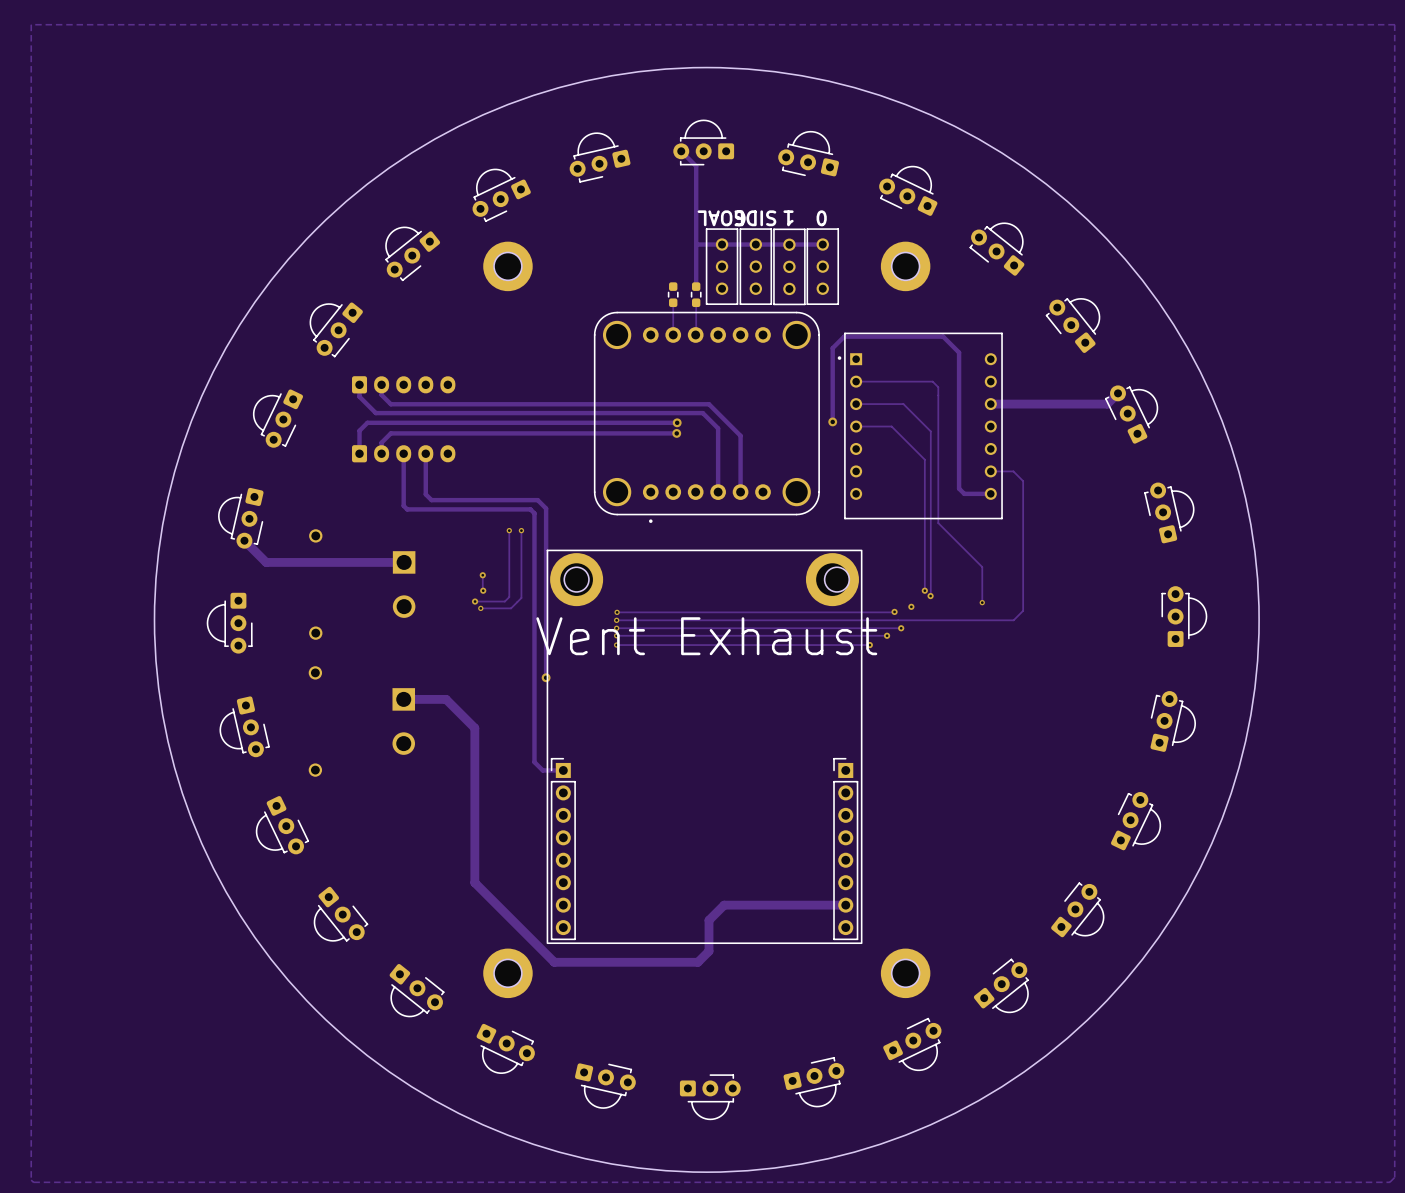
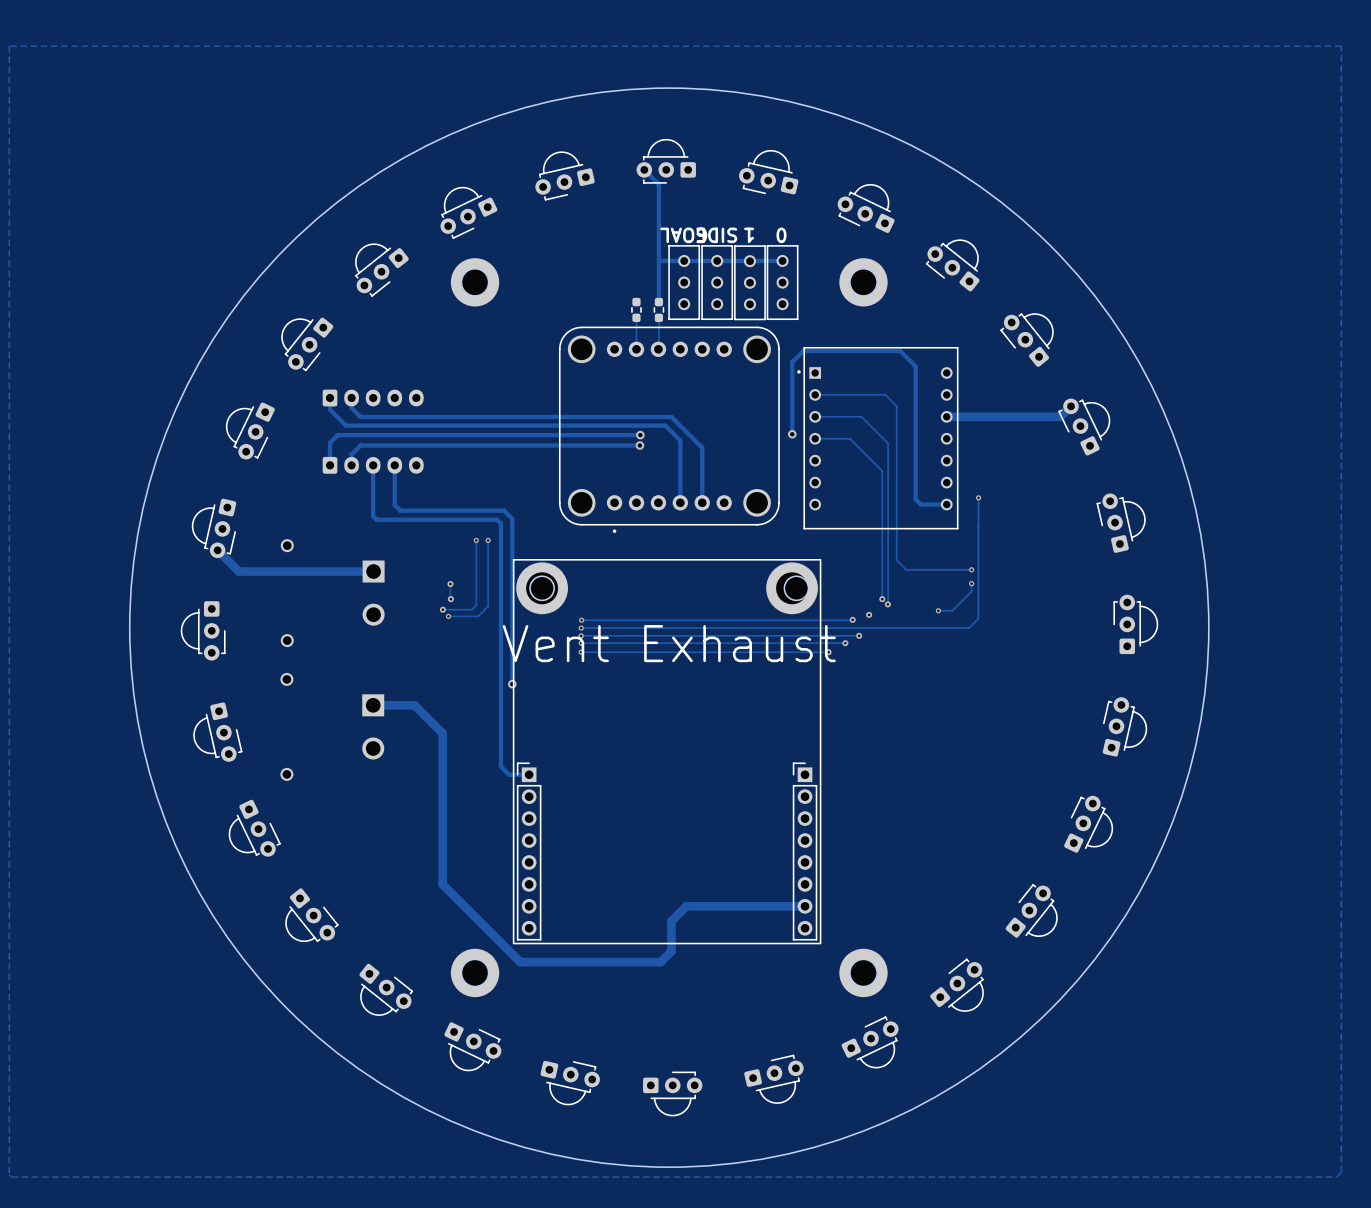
track: (928, 381) (932, 381) (938, 387) (938, 523) (982, 567) (982, 602) -> (885, 394) (896, 406) (896, 560) (906, 569) (971, 569)
track: (990, 471) (1013, 471) (1023, 481) (1023, 516) -> (978, 497) (978, 526)
via: none -> (978, 497)
via: none -> (971, 569)
track: none -> (971, 583) (971, 591) (952, 610) (938, 610)
via: none -> (971, 583)

